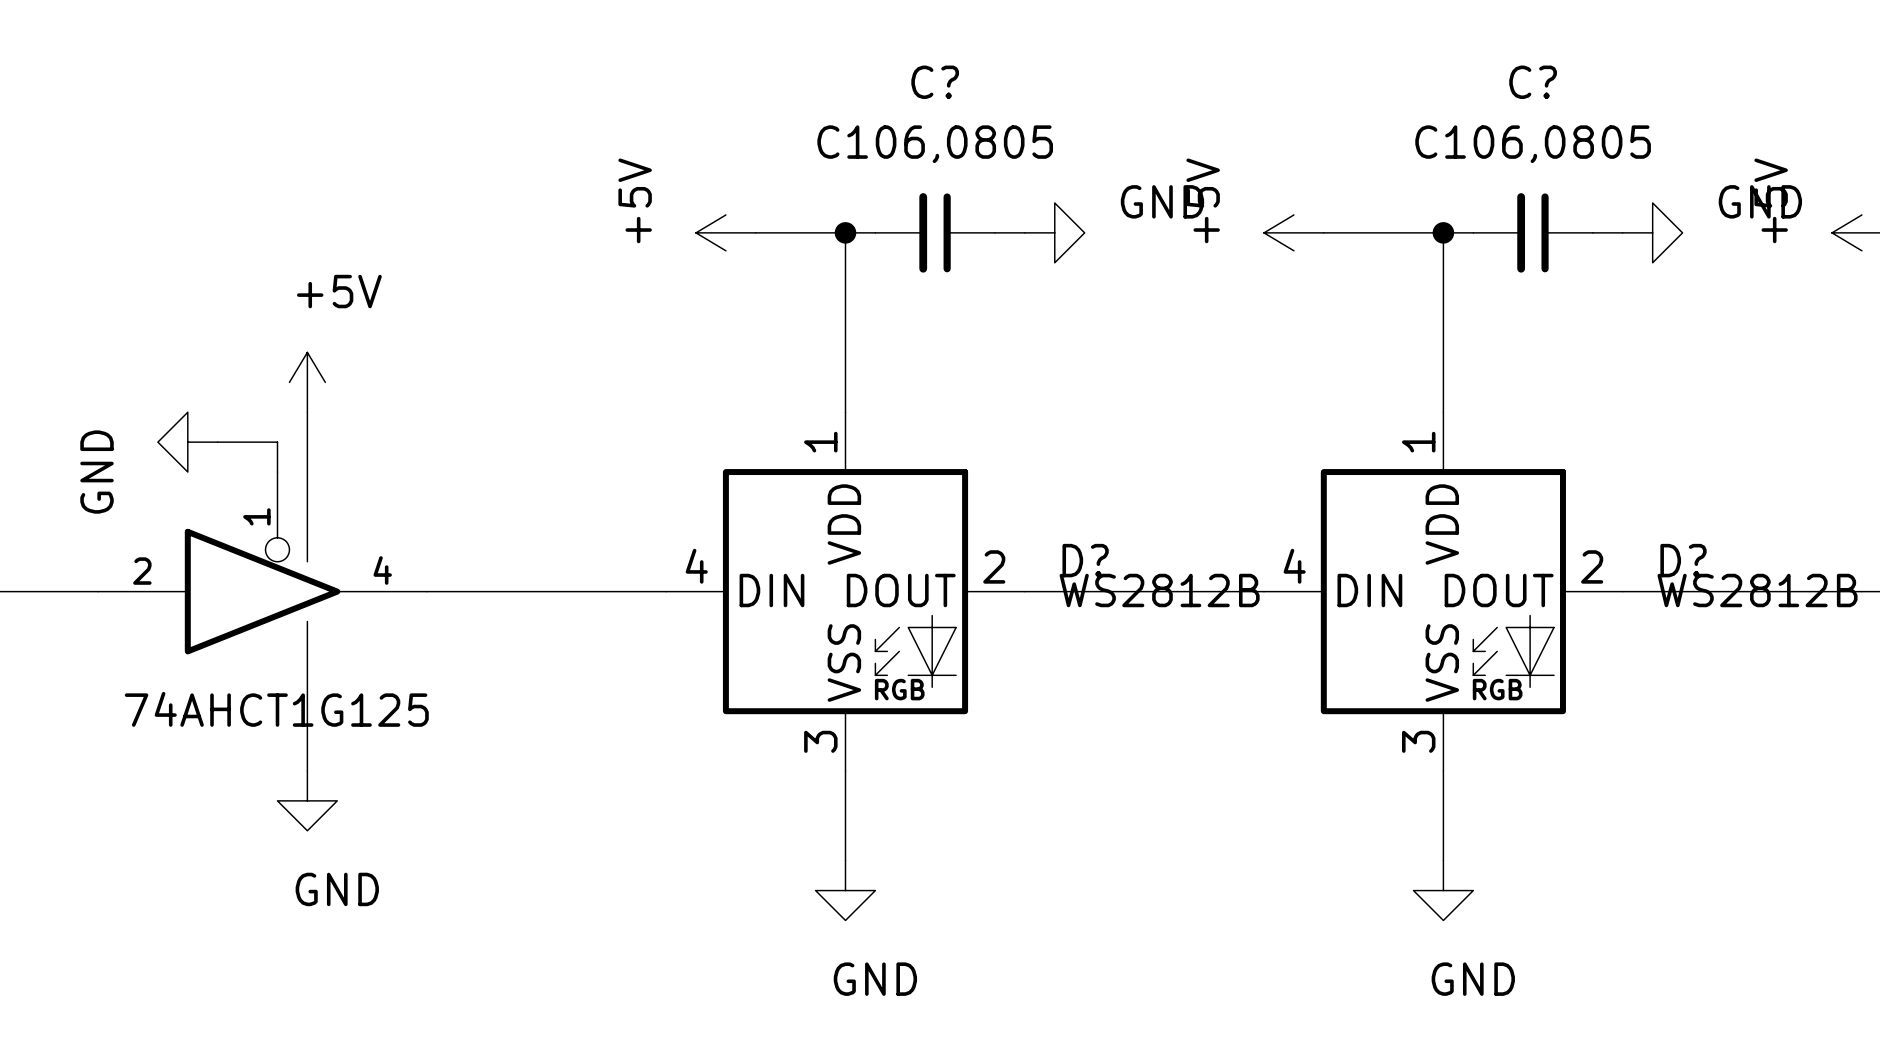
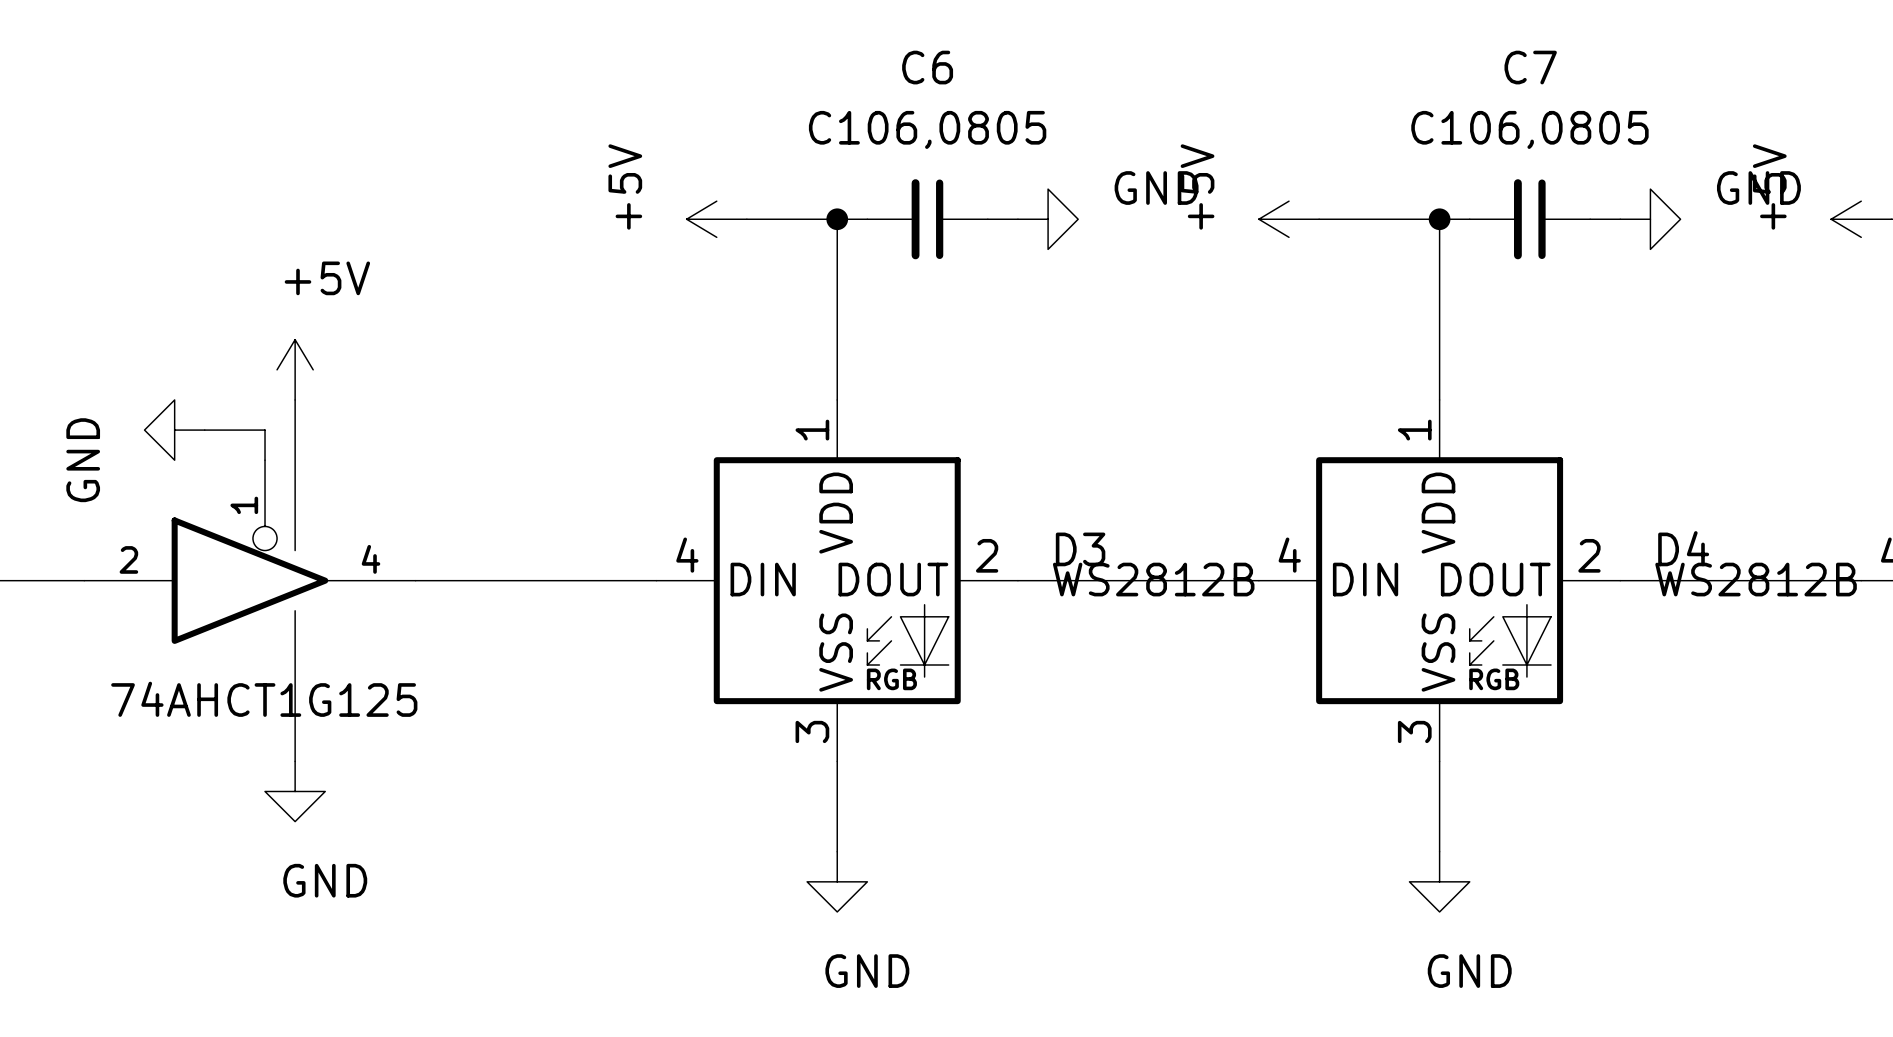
C? name: C? (935, 82) -> C6 (927, 67)
C? name: C? (1533, 82) -> C7 (1530, 67)
D? name: D? (1085, 560) -> D3 (1080, 549)
D? name: D? (1683, 560) -> D4 (1683, 548)

